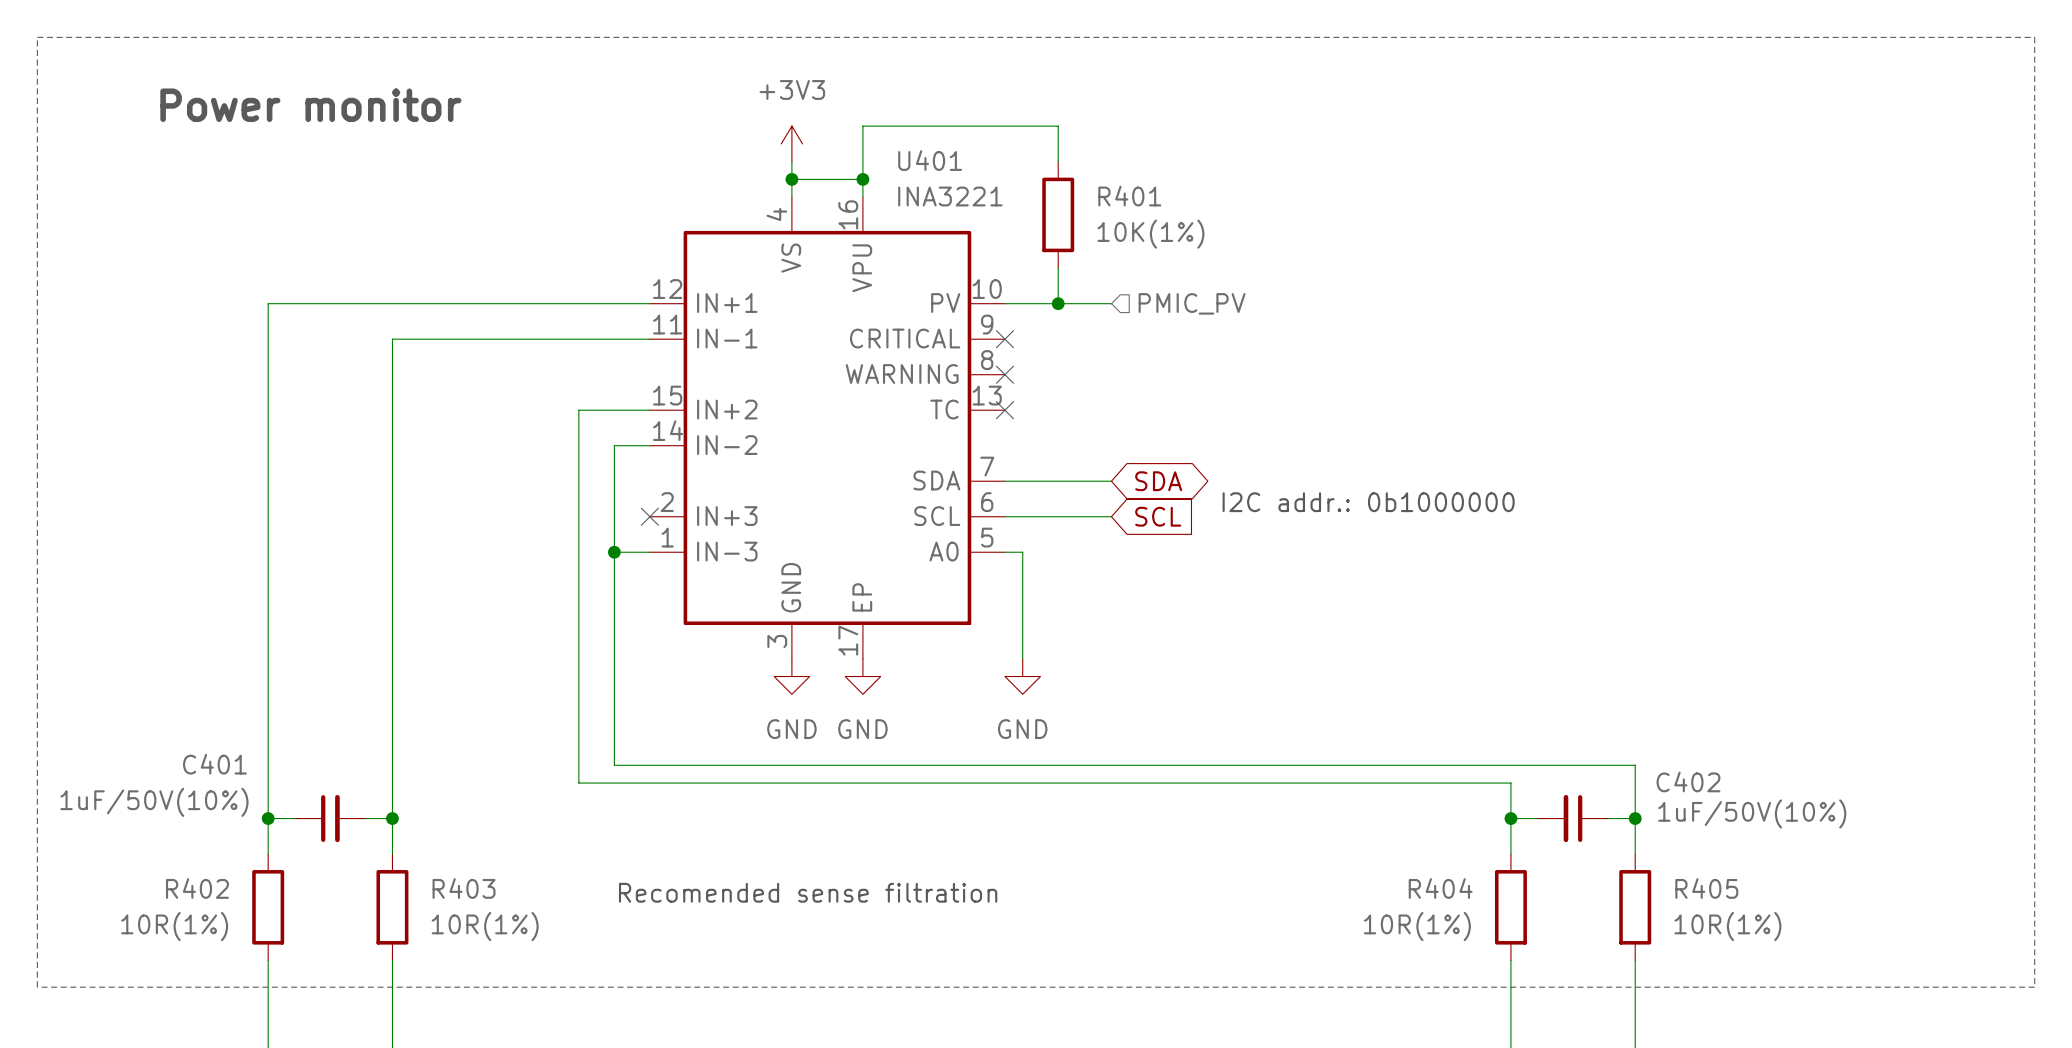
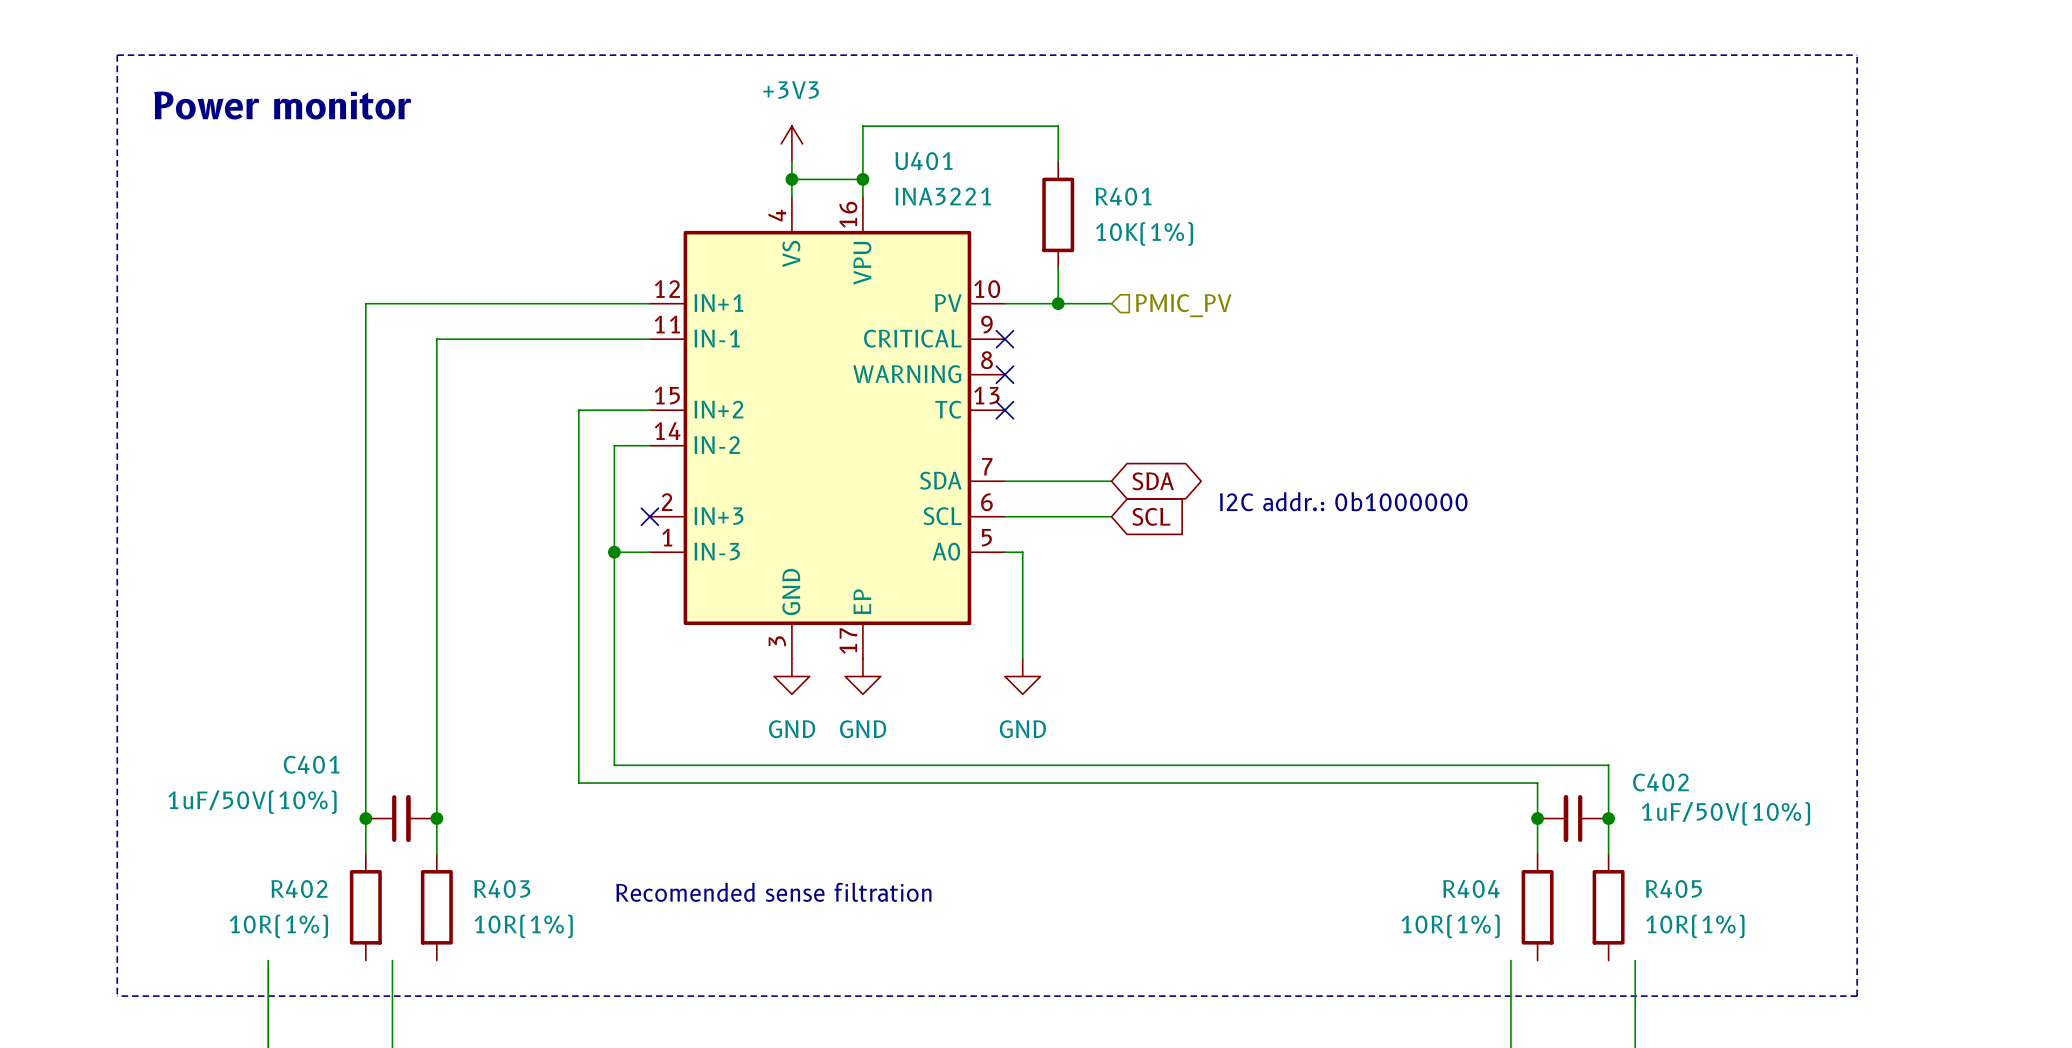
line: (37, 37) (2034, 37) (2034, 987) (37, 987) (37, 37) -> (117, 55) (117, 996) (1857, 996) (1857, 55) (117, 55)
wire: (365, 303) (268, 303) (268, 854) -> (365, 303) (365, 854)
wire: (436, 339) (392, 339) (392, 854) -> (436, 339) (436, 854)
C401 name position: C401 (214, 764) -> C401 (311, 764)
wire: (1608, 765) (1635, 765) (1635, 854) -> (1608, 765) (1608, 854)
C402 name position: C402 (1688, 781) -> C402 (1660, 782)
wire: (1510, 783) (1510, 854) -> (1510, 783) (1537, 783) (1537, 854)
C401 value position: 1uF/50V(10%) (154, 802) -> 1uF/50V(10%) (252, 802)
C402 value position: 1uF/50V(10%) (1752, 813) -> 1uF/50V(10%) (1726, 813)
wire: (268, 818) (294, 818) -> none
junction: (268, 818) -> none
C401 position: (330, 818) -> (401, 818)
junction: none -> (365, 818)
junction: (392, 818) -> none
junction: none -> (436, 818)
wire: (1510, 818) (1537, 818) -> none
junction position: (1510, 818) -> (1537, 818)
wire: (1608, 818) (1635, 818) -> none
junction position: (1635, 818) -> (1608, 818)
R402 position: (268, 907) -> (365, 907)
R403 position: (392, 907) -> (436, 907)
R404 position: (1510, 907) -> (1537, 907)
R405 position: (1635, 907) -> (1608, 907)

